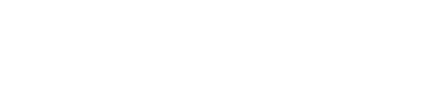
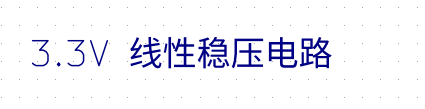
text: none -> 3.3V 线性稳压电路 (182, 52)

